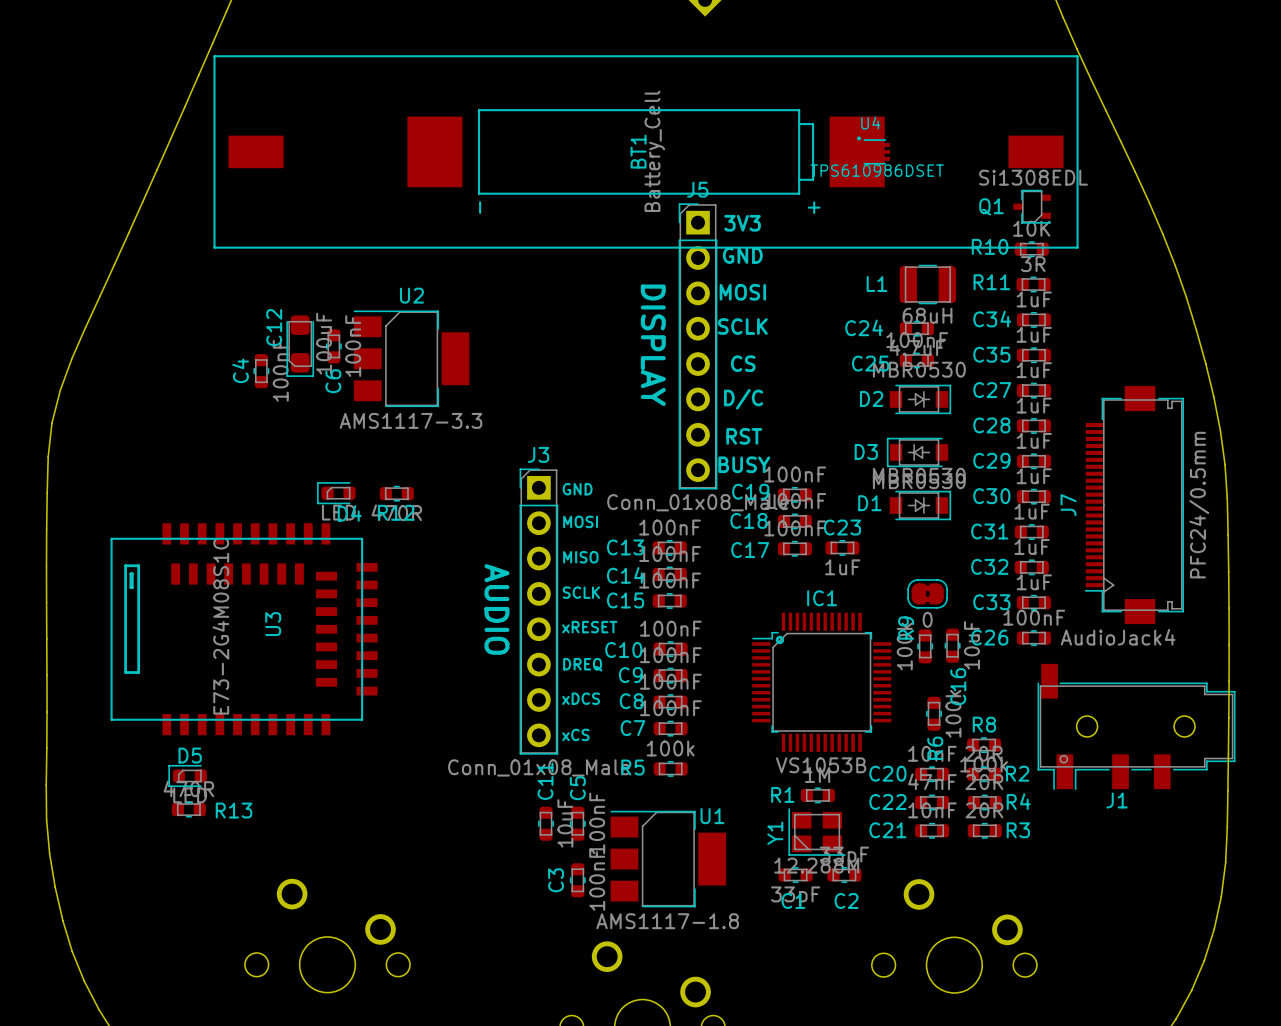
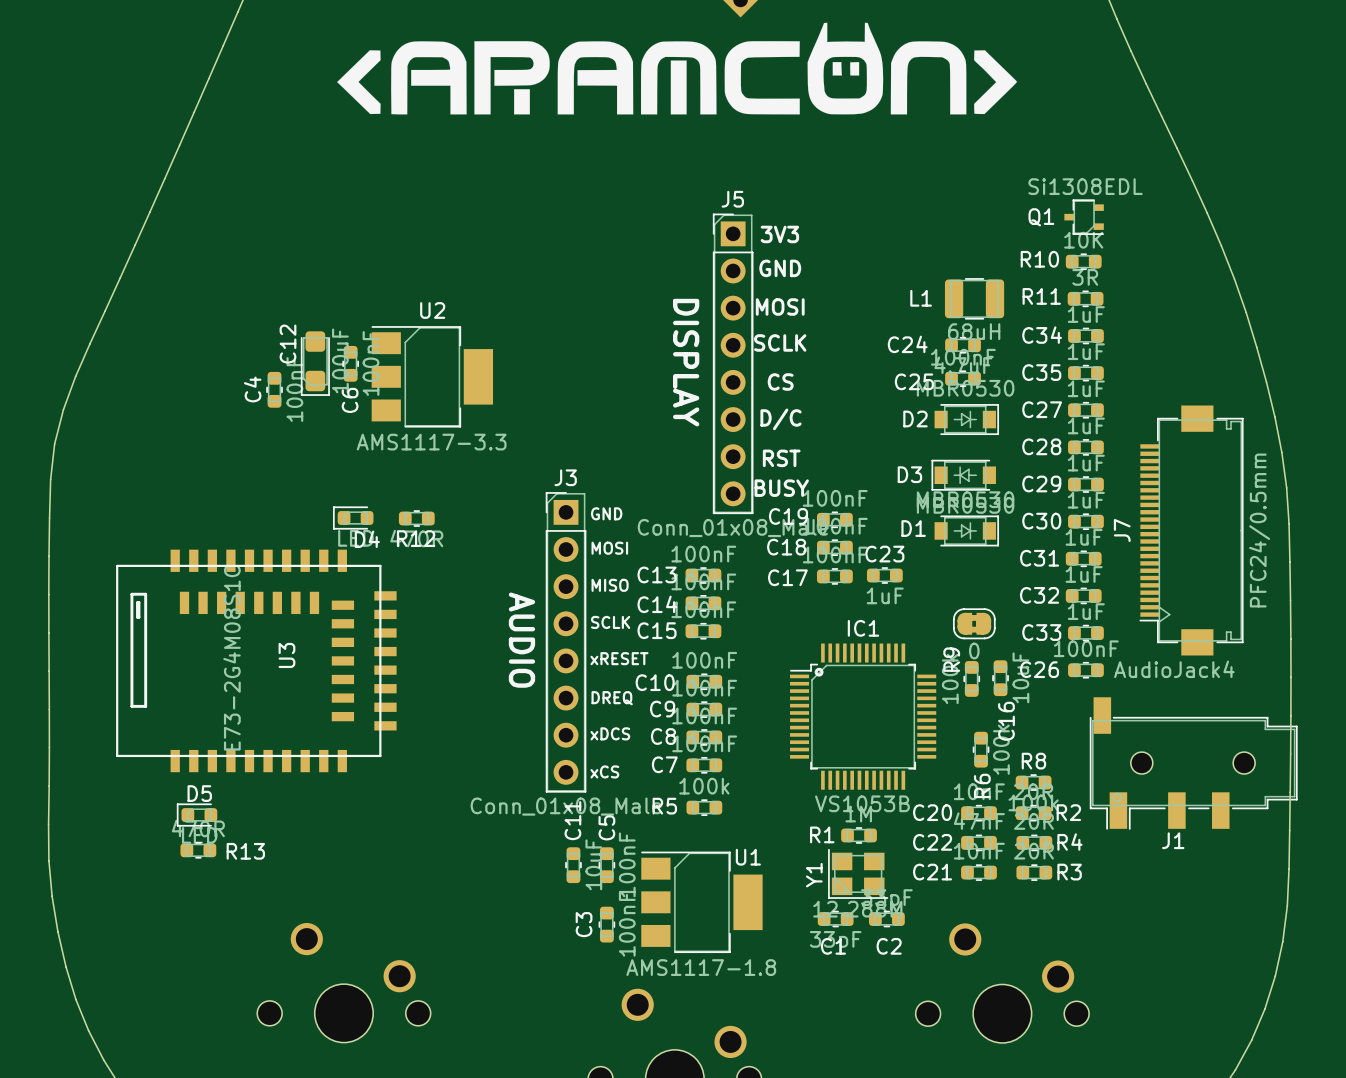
drawing: none -> [337, 22, 1018, 115]
U4: TPS610986DSET (873, 150) -> none
BT1: Battery_Cell (646, 151) -> none

